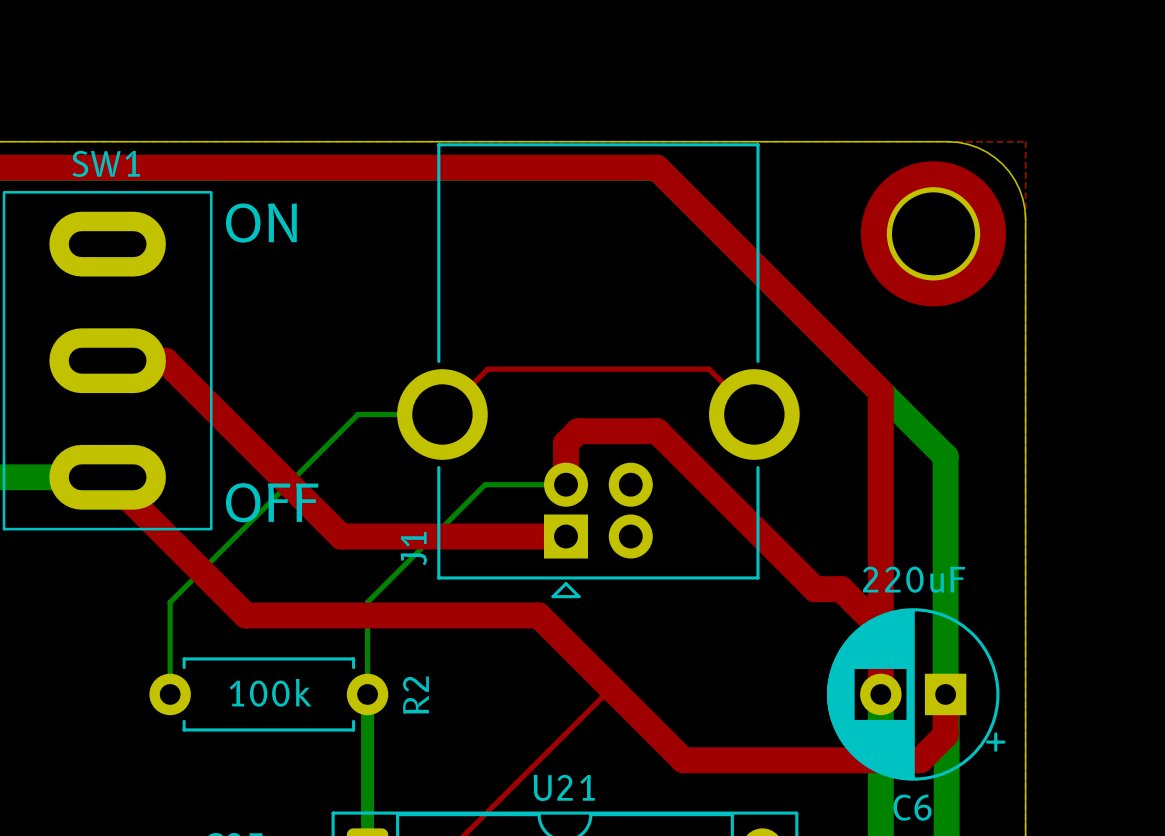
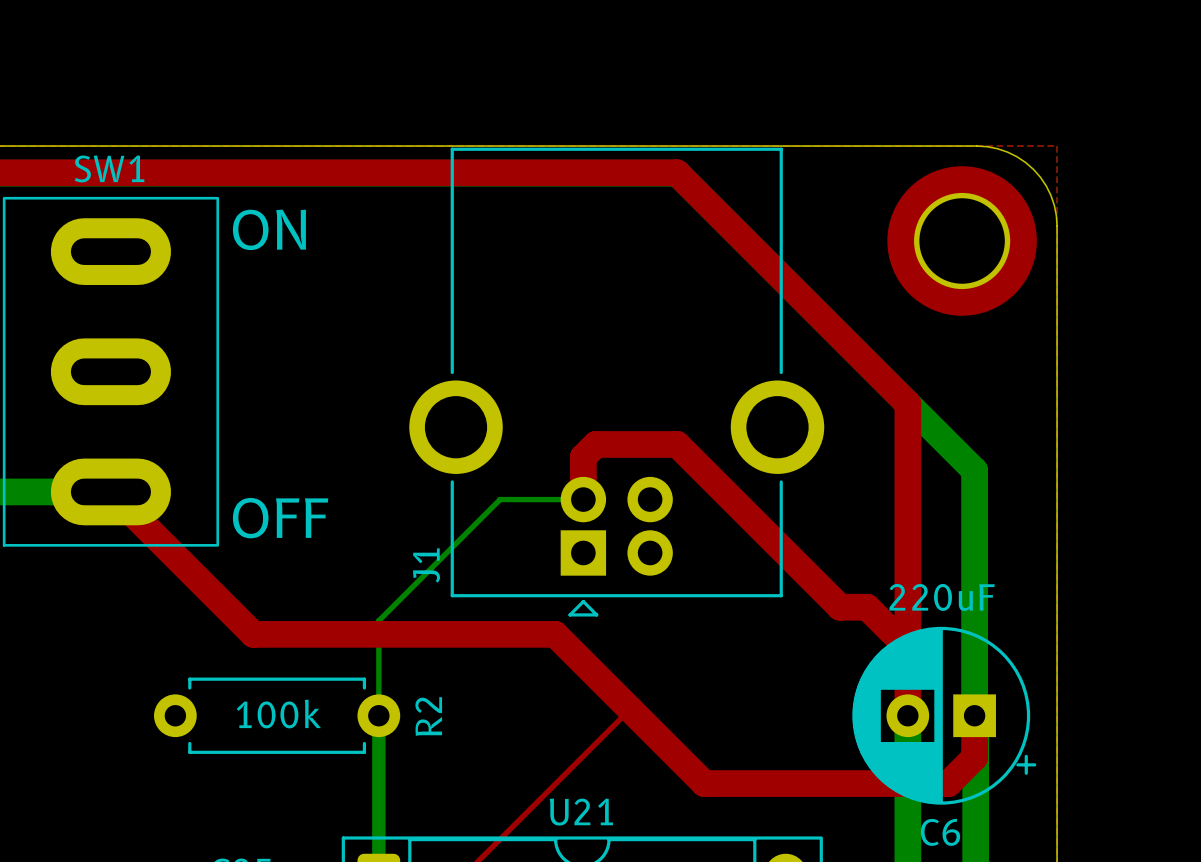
top track: (107, 360) (165, 360) (341, 536) (566, 536) -> none
top track: (442, 414) (487, 369) (709, 369) (754, 414) -> none
bottom track: (442, 414) (357, 414) (170, 602) (170, 694) -> none

